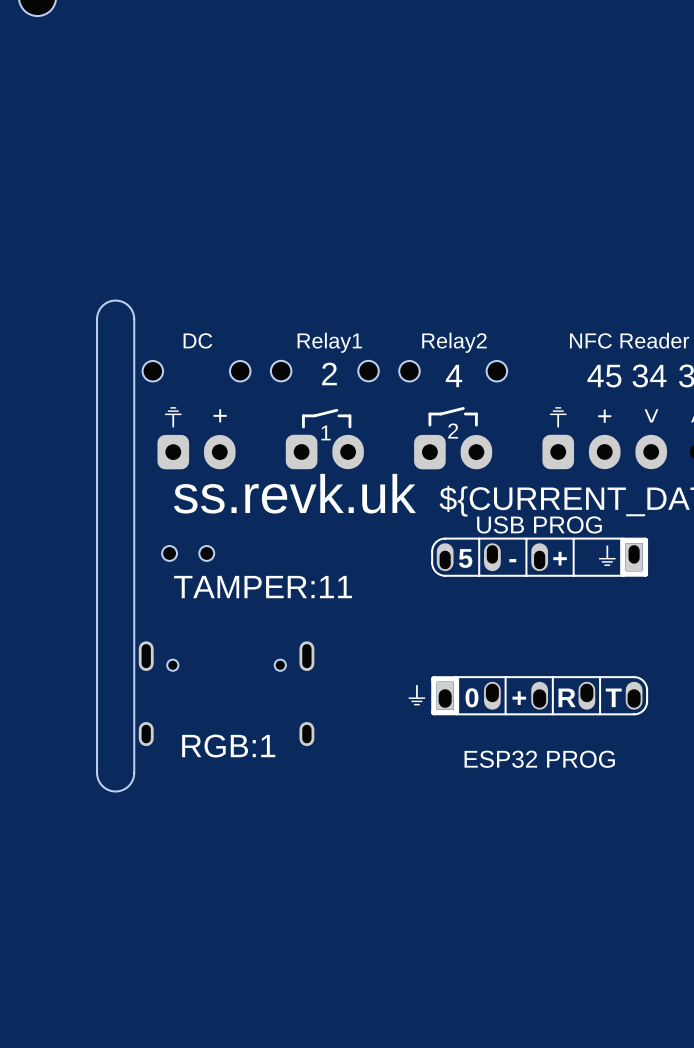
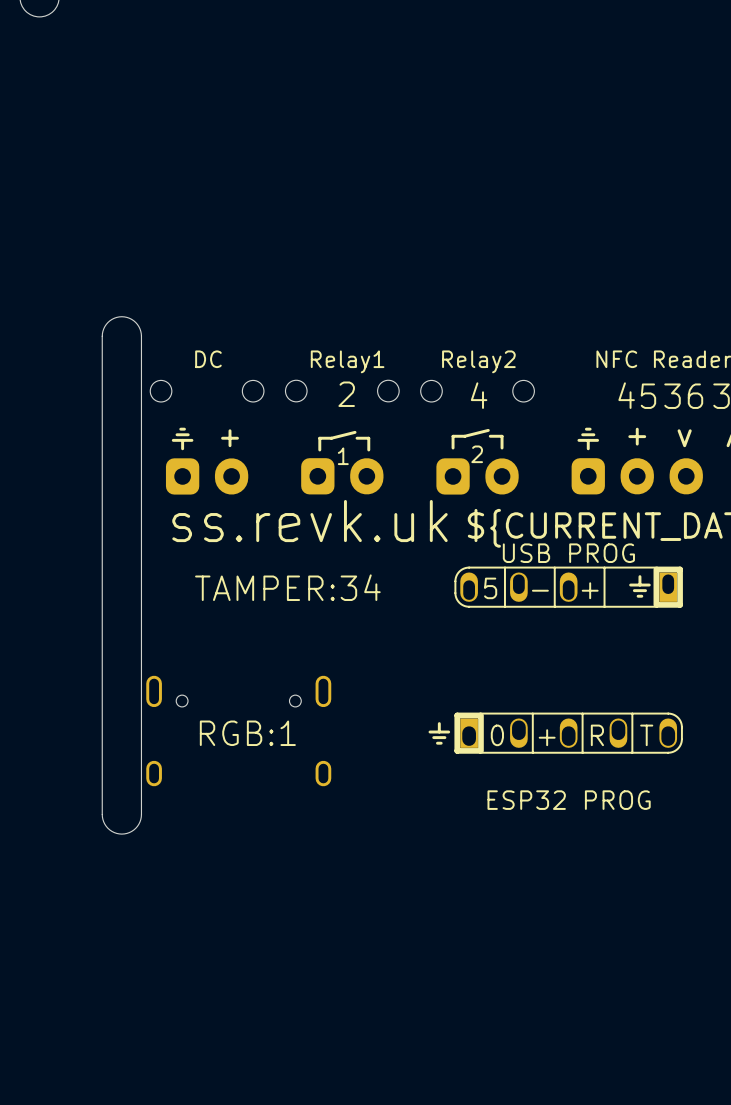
text: 34 (649, 375) -> 36 (683, 396)
part: (188, 553) -> none
text: TAMPER:11 (263, 587) -> TAMPER:34 (287, 587)
text position: RGB:1 (228, 746) -> RGB:1 (247, 733)

